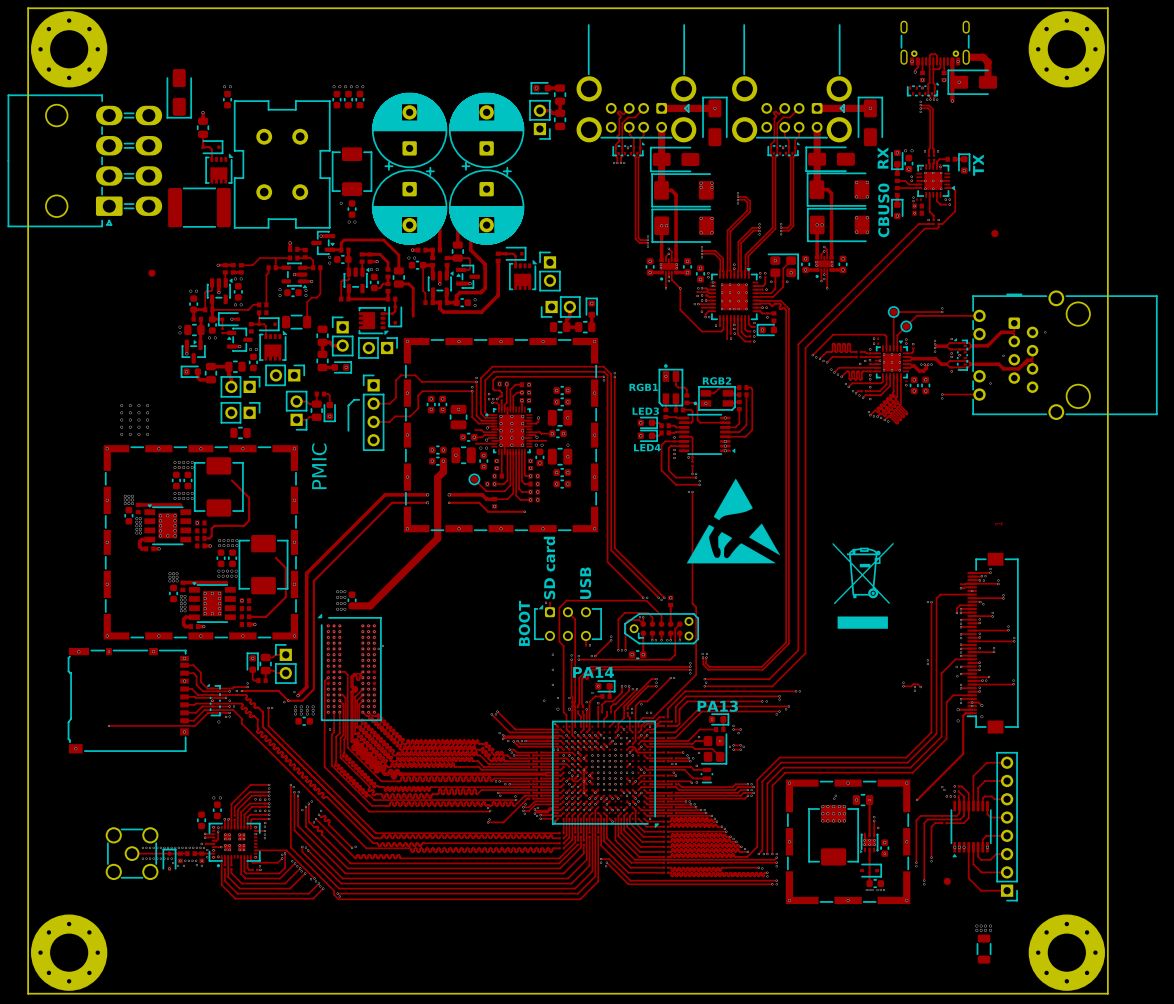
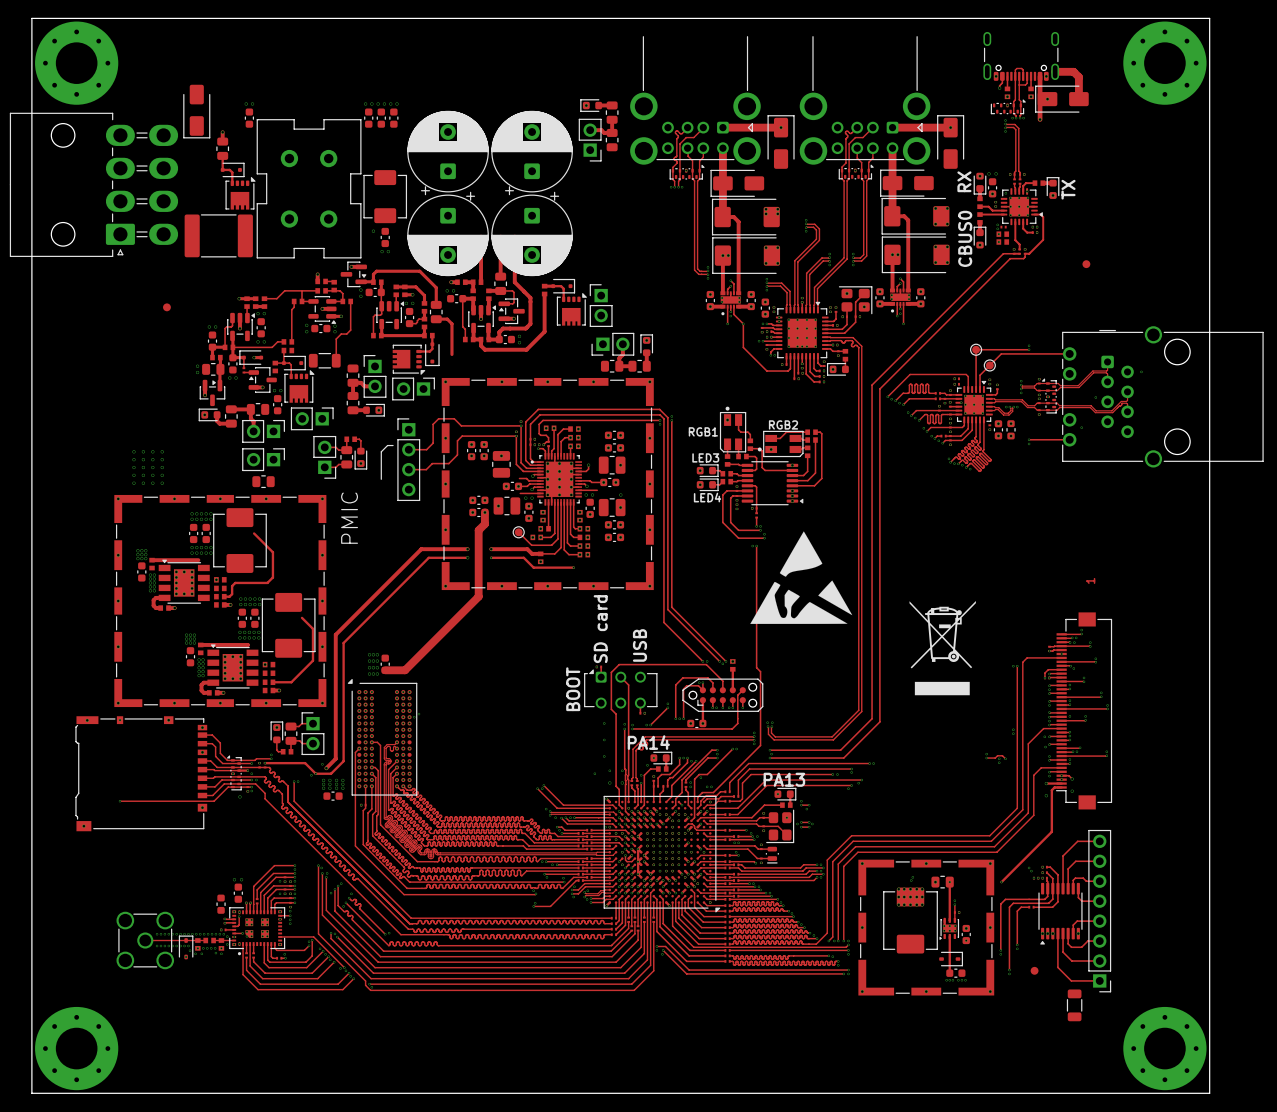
via: (976, 926) -> none
via: (981, 926) -> none
via: (985, 926) -> none
via: (990, 926) -> none
via: (976, 930) -> none
via: (981, 930) -> none
via: (985, 930) -> none
via: (990, 930) -> none
part position: (984, 949) -> (1074, 1005)

